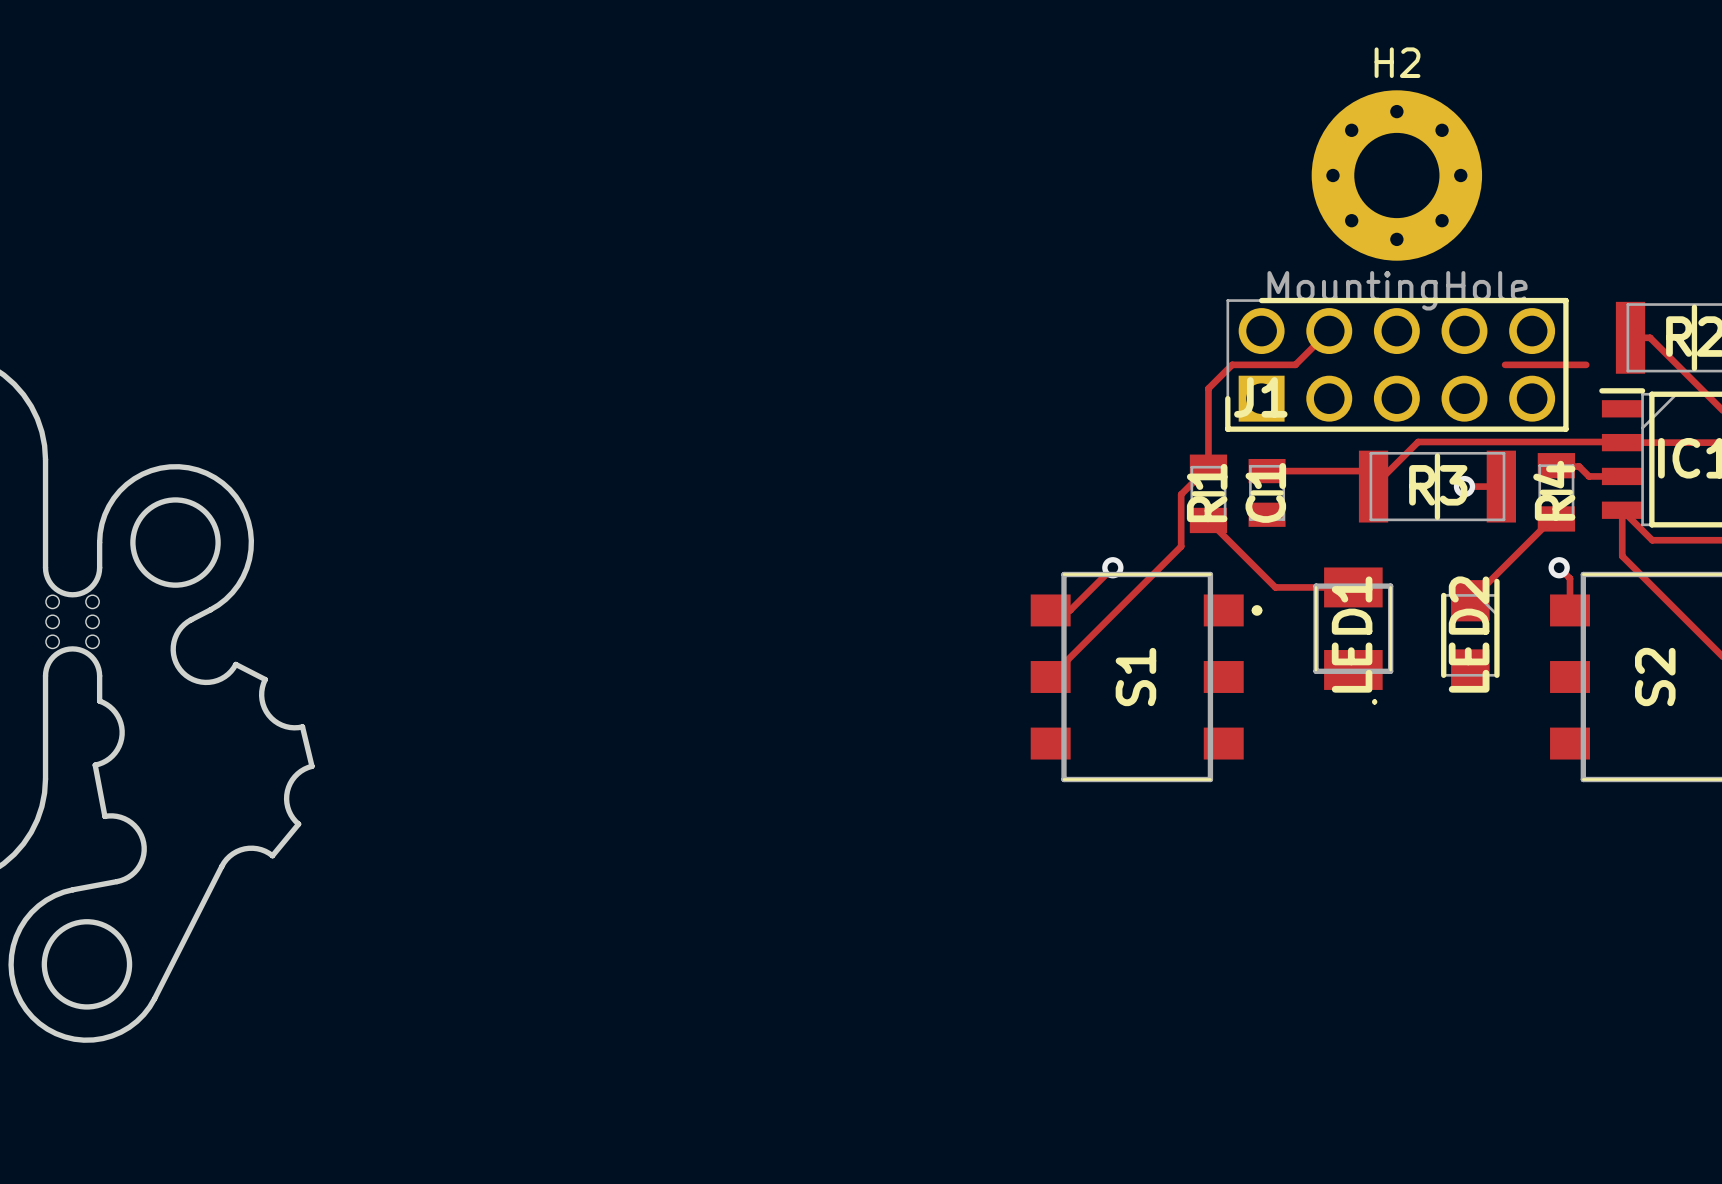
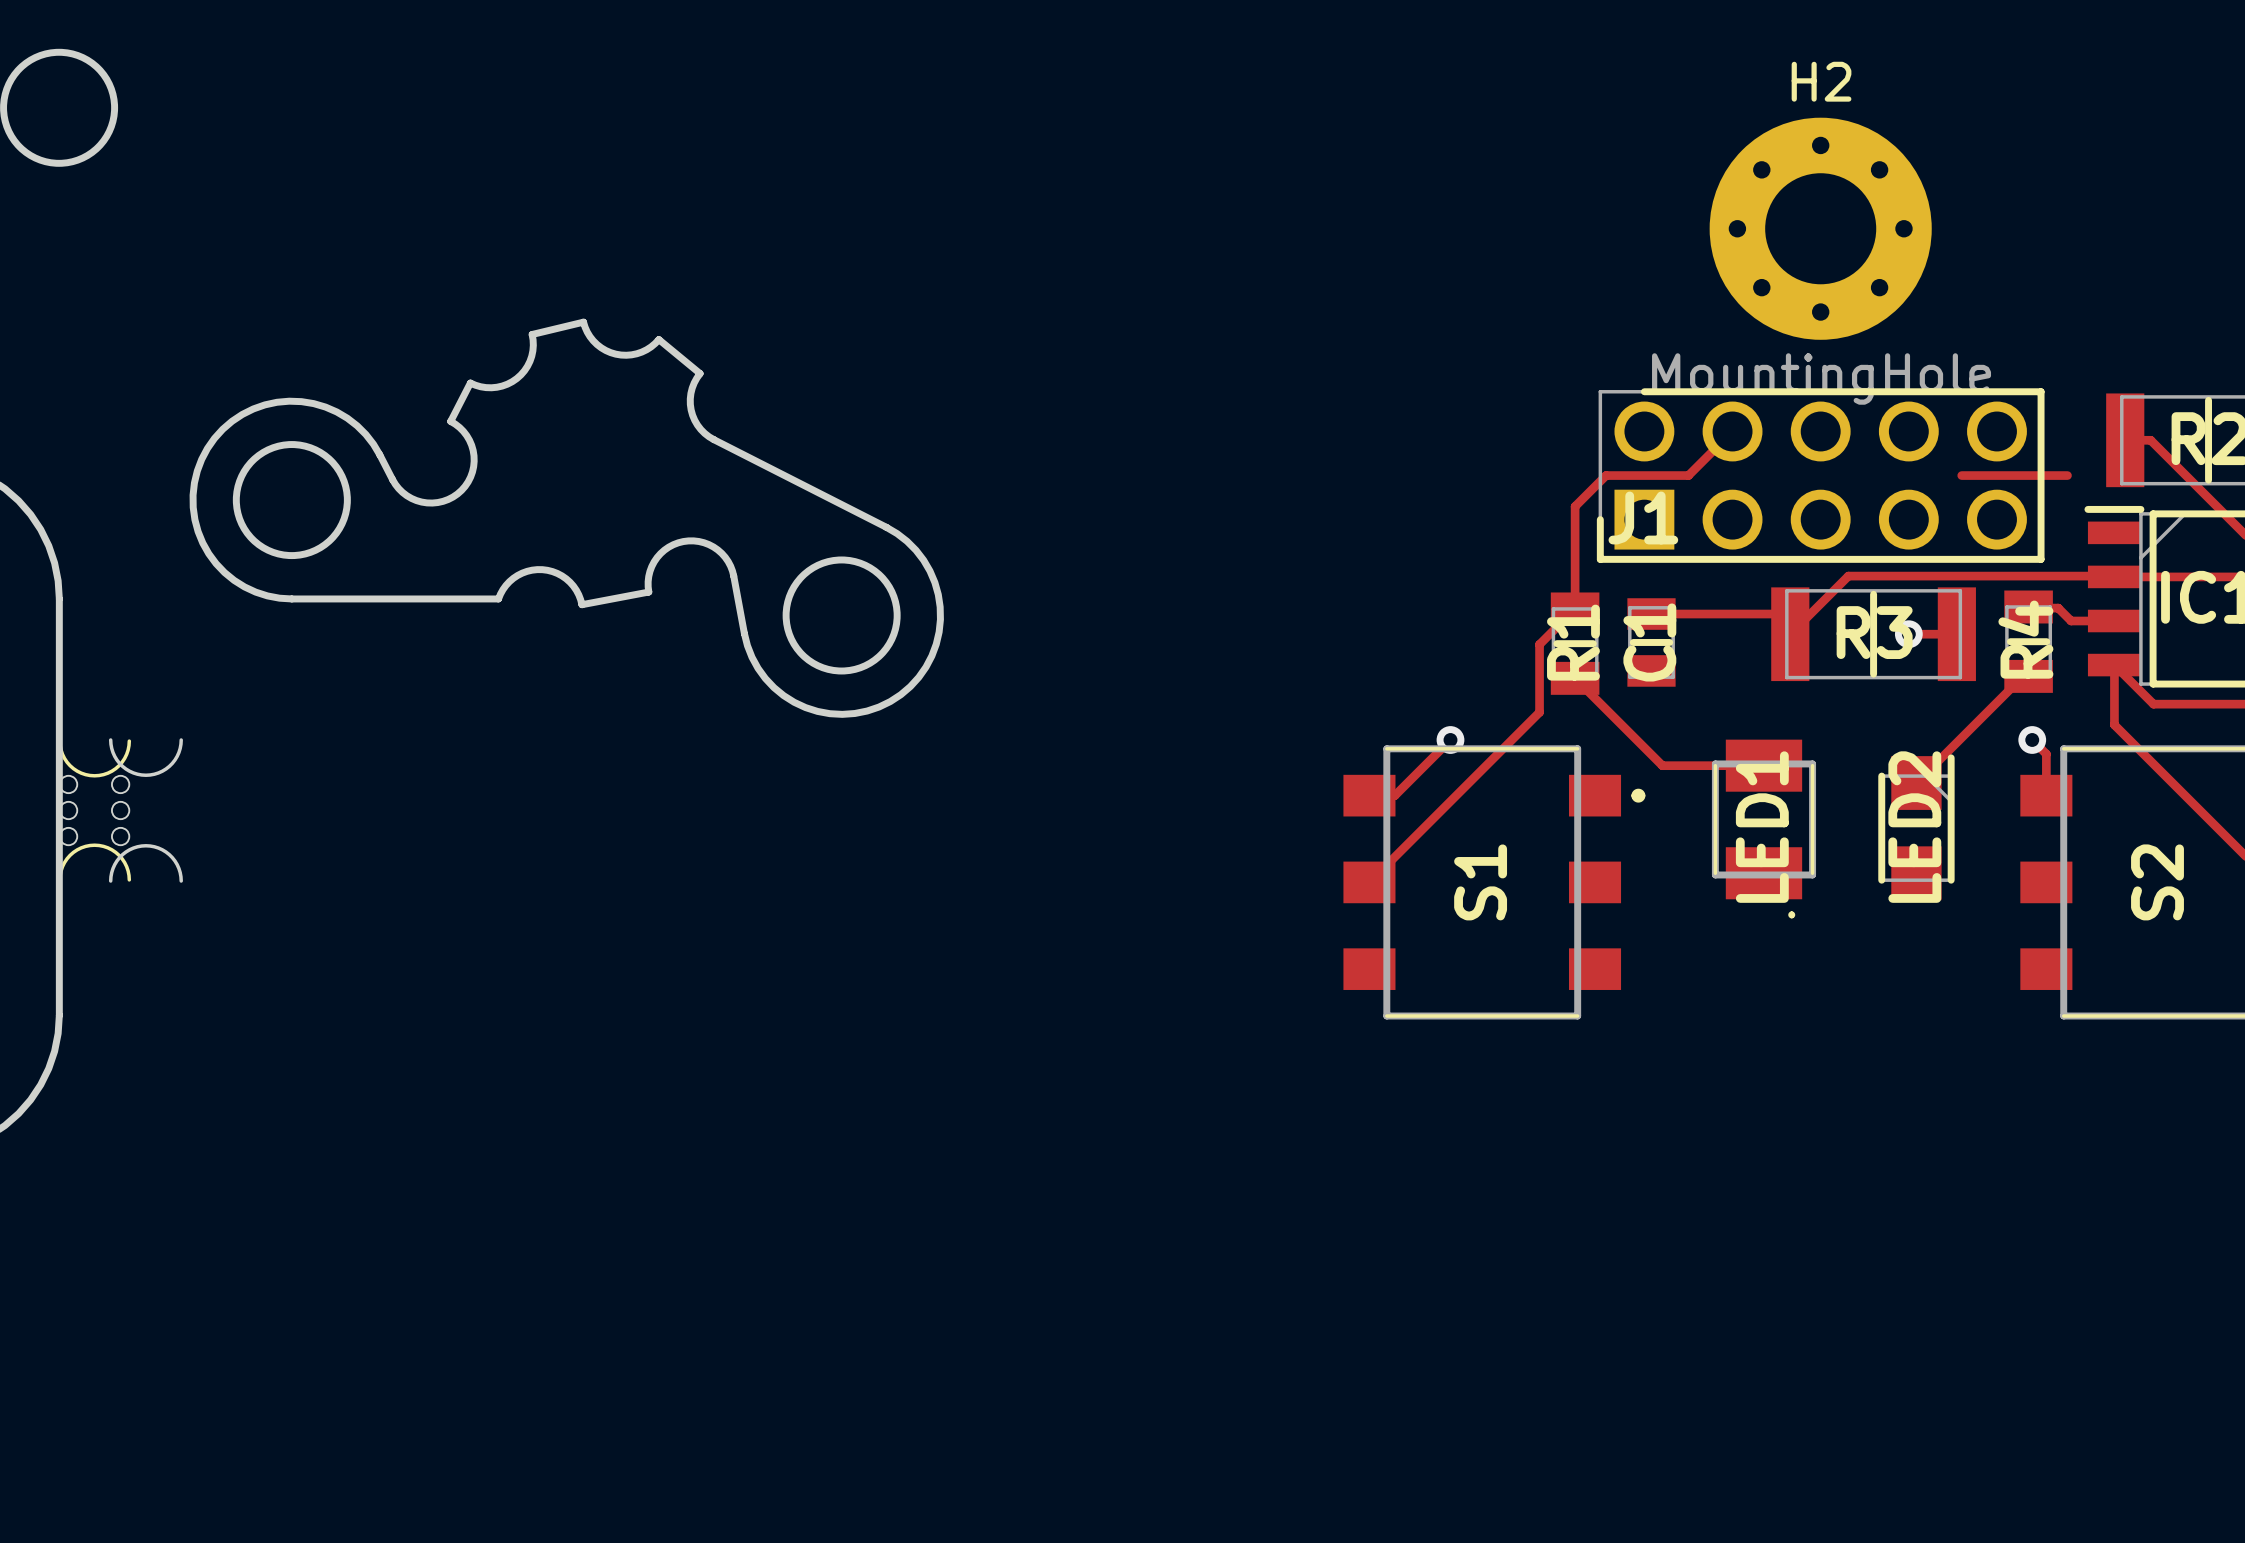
round board edge: none -> [0, 48, 119, 167]
board edge: none -> (583, 322) (532, 334) (533, 345) (529, 361) (524, 370) (512, 381) (491, 387) (470, 383) (450, 421) (463, 431) (471, 445) (474, 455) (472, 471) (461, 490) (443, 501) (421, 502) (402, 492) (395, 484) (379, 454) (365, 434) (347, 418) (325, 407) (301, 401) (276, 402) (253, 408) (242, 414) (232, 421) (214, 438) (201, 459) (194, 482) (193, 507) (194, 519) (198, 531) (208, 553) (224, 572) (234, 580) (255, 592) (279, 598) (498, 598) (505, 585) (517, 575) (532, 570) (542, 569) (557, 573) (570, 582) (578, 594) (581, 604) (648, 592) (649, 571) (660, 553) (678, 542) (698, 541) (717, 549) (728, 561) (732, 571) (744, 633) (752, 657) (765, 678) (783, 695) (805, 707) (829, 713) (842, 714) (867, 711) (879, 707) (900, 694) (910, 686) (918, 677) (931, 655) (939, 632) (940, 619) (940, 606) (934, 582) (929, 571) (915, 550) (897, 533) (886, 527) (704, 433) (694, 420) (690, 404) (692, 388) (700, 373) (658, 339) (646, 349) (636, 353) (615, 354) (605, 350) (593, 340) (583, 322)
round board edge: none -> [782, 556, 901, 675]
round board edge position: (175, 542) -> (291, 500)
board edge: (45, 567) (49, 581) (62, 592) (79, 593) (91, 586) (99, 571) (100, 533) (104, 514) (119, 490) (142, 474) (160, 468) (188, 467) (206, 473) (222, 483) (235, 496) (245, 513) (250, 531) (249, 559) (243, 577) (232, 592) (218, 605) (187, 621) (178, 630) (173, 646) (174, 658) (182, 672) (197, 681) (209, 682) (221, 678) (231, 671) (235, 664) (265, 679) (261, 695) (266, 711) (274, 721) (281, 725) (290, 727) (302, 726) (311, 766) (294, 776) (287, 791) (289, 811) (298, 824) (272, 855) (261, 849) (248, 848) (236, 851) (226, 859) (149, 1007) (136, 1021) (121, 1032) (93, 1039) (74, 1039) (55, 1033) (32, 1017) (20, 1001) (13, 983) (11, 964) (13, 945) (25, 919) (46, 900) (63, 892) (121, 880) (131, 875) (141, 862) (143, 842) (137, 828) (128, 820) (116, 816) (104, 816) (95, 765) (106, 760) (115, 753) (120, 742) (122, 730) (115, 712) (99, 701) (99, 672) (96, 662) (82, 650) (65, 649) (51, 659) (45, 675) -> (59, 739) (59, 881)
board edge: none -> (110, 739) (112, 752) (119, 763) (133, 772) (145, 775) (158, 772) (172, 763) (178, 752) (181, 739)
board edge: none -> (110, 881) (112, 868) (119, 857) (133, 848) (145, 845) (158, 848) (172, 857) (178, 868) (181, 881)
round board edge: [41, 919, 133, 1010] -> none

